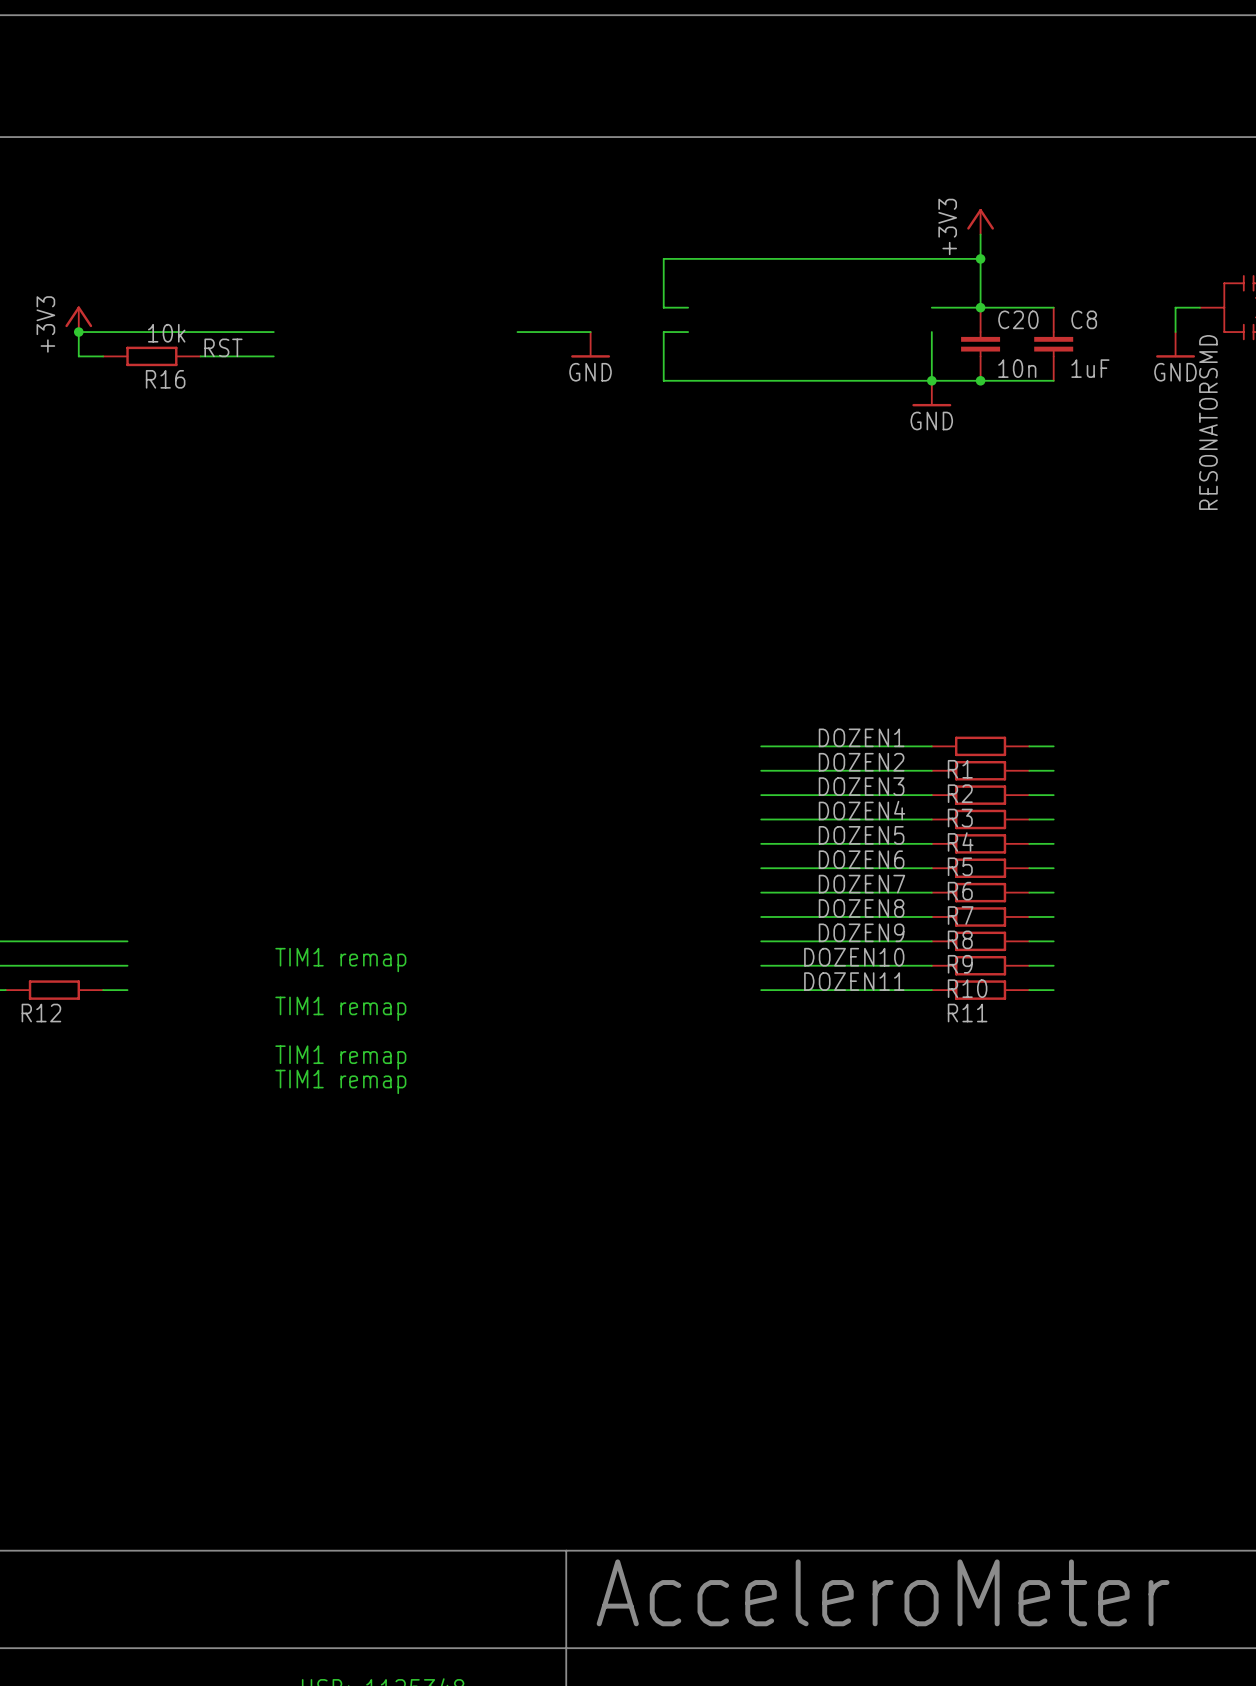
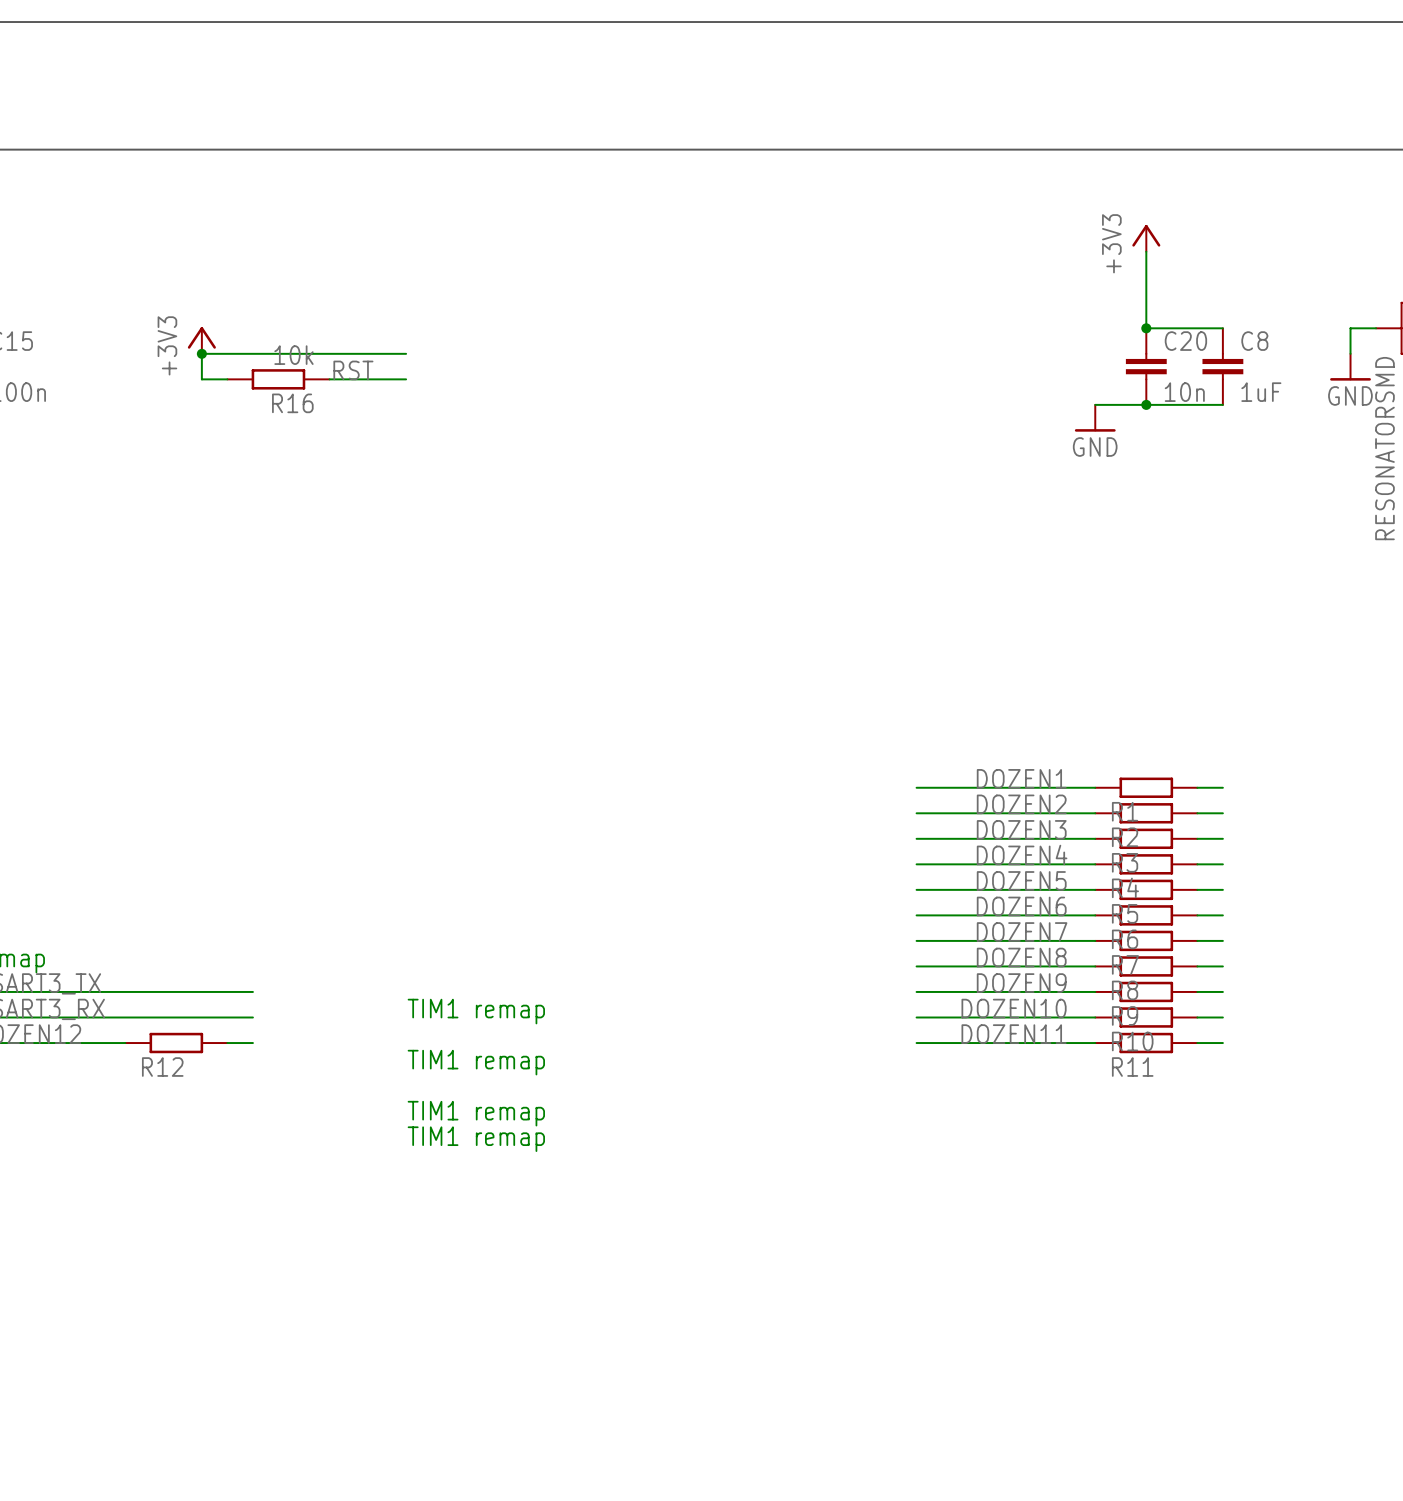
wire: (980, 258) (663, 258) (663, 307) (688, 307) -> none
junction: (980, 258) -> none
wire: (931, 307) (980, 307) -> none
wire: (517, 332) (590, 332) -> none
wire: (688, 332) (663, 332) (663, 380) (931, 380) (931, 332) -> none
power symbol: GND (590, 344) -> none
junction: (931, 380) -> none

